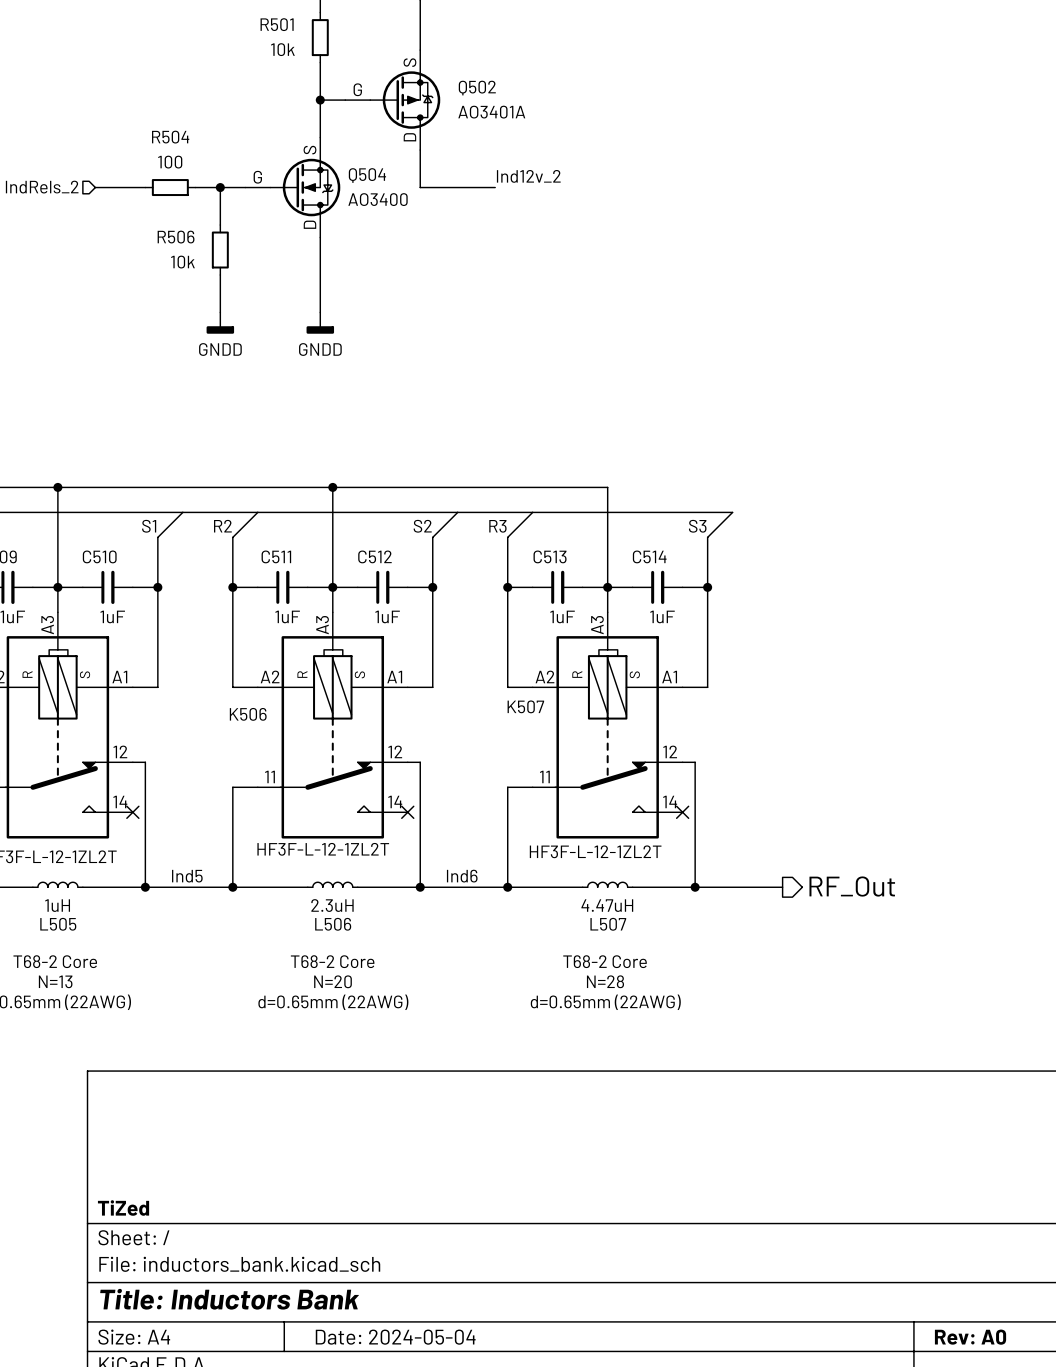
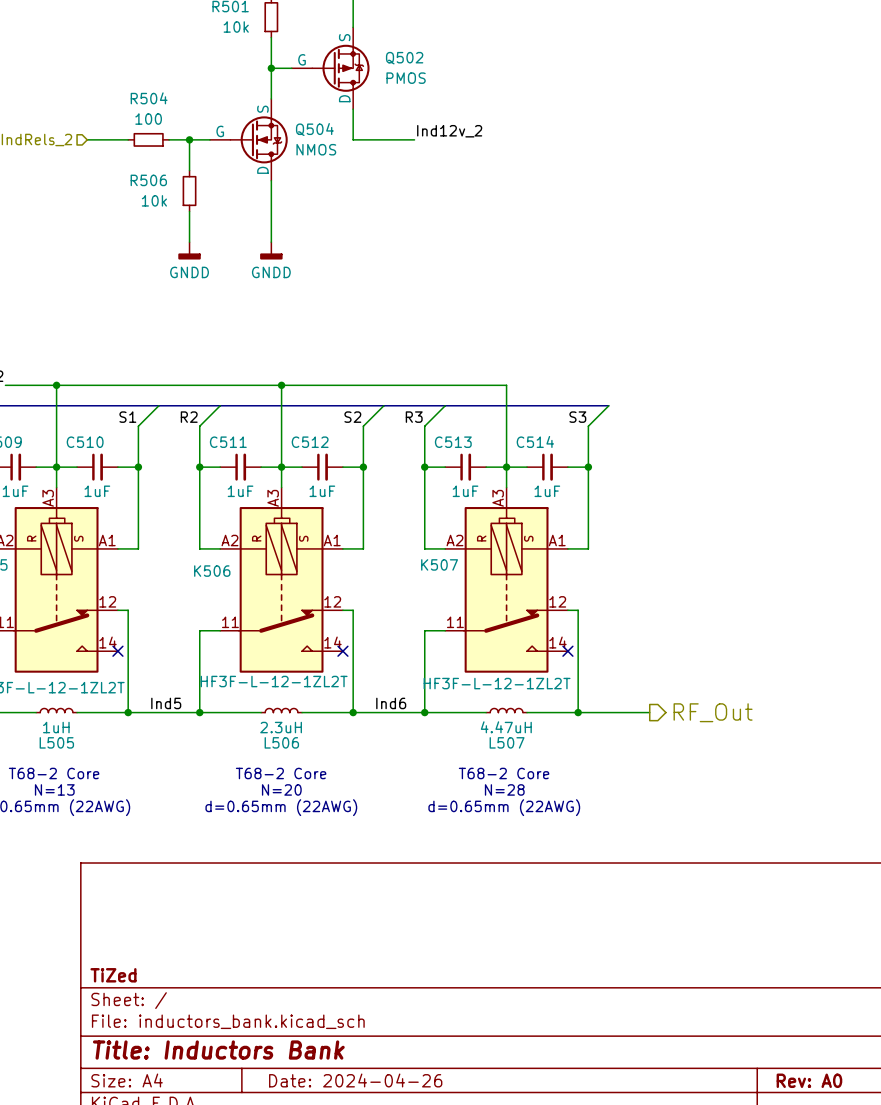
Q502 value: AO3401A (491, 112) -> PMOS (406, 78)
Q504 value: AO3400 (378, 199) -> NMOS (316, 149)
title block: Date: 2024-05-04 (395, 1337) -> Date: 2024-04-26 (355, 1080)

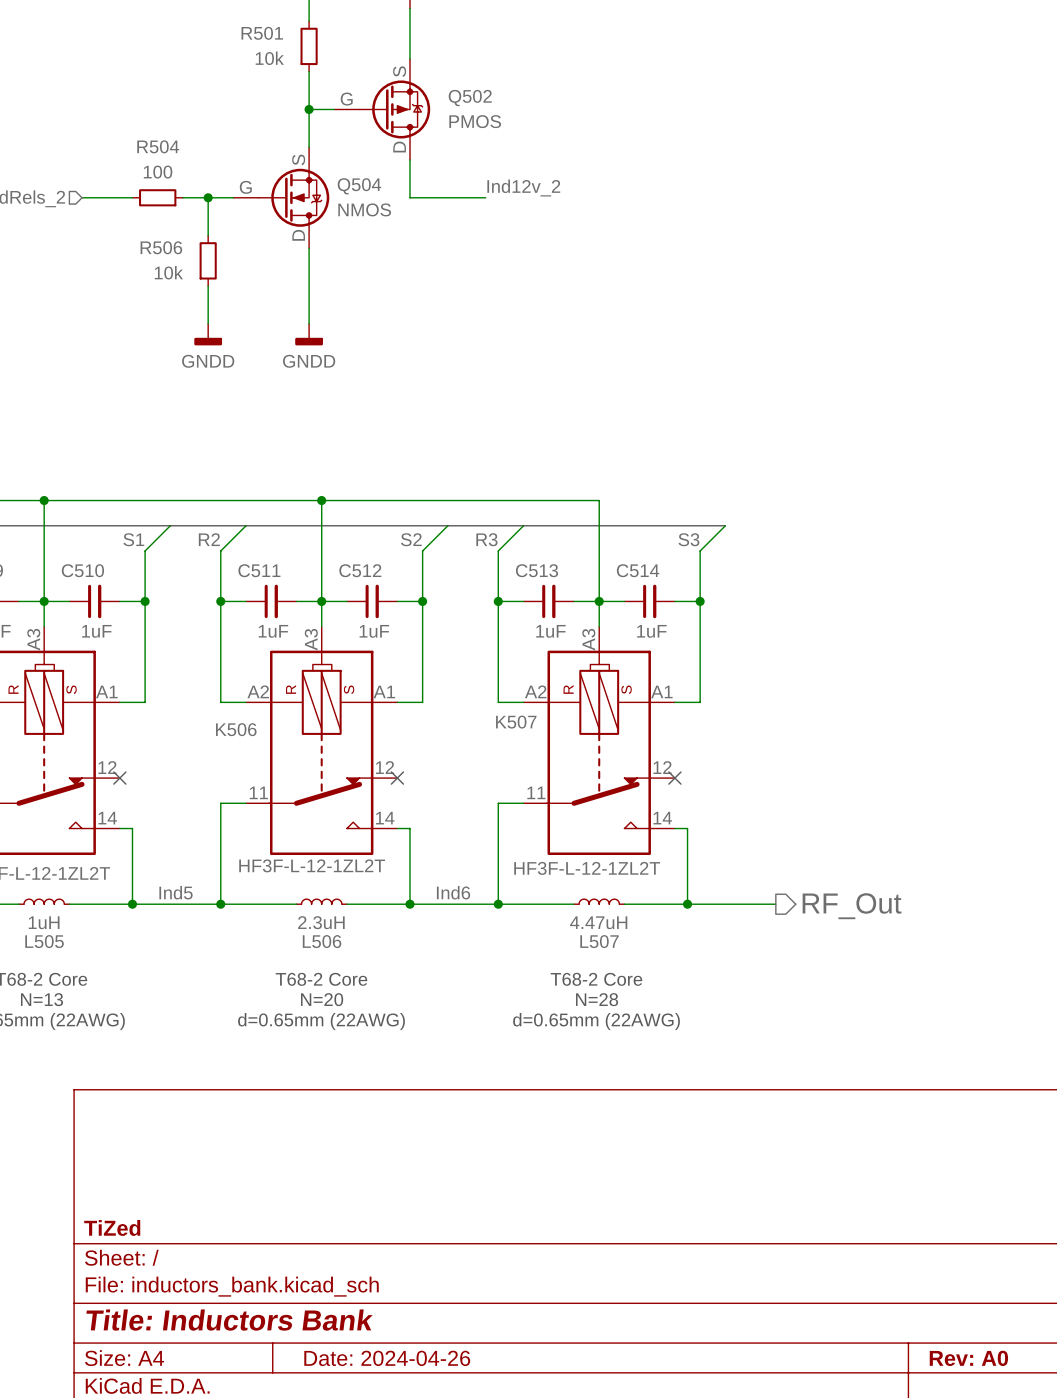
wire: (117, 610) (128, 610) (128, 651) -> (119, 828) (132, 828)
wire: (342, 610) (353, 610) (353, 651) -> (397, 828) (410, 828)
wire: (567, 610) (578, 610) (578, 651) -> (674, 828) (687, 828)
no-connect mark position: (117, 651) -> (119, 778)
no-connect mark position: (342, 651) -> (397, 778)
no-connect mark position: (567, 651) -> (674, 778)

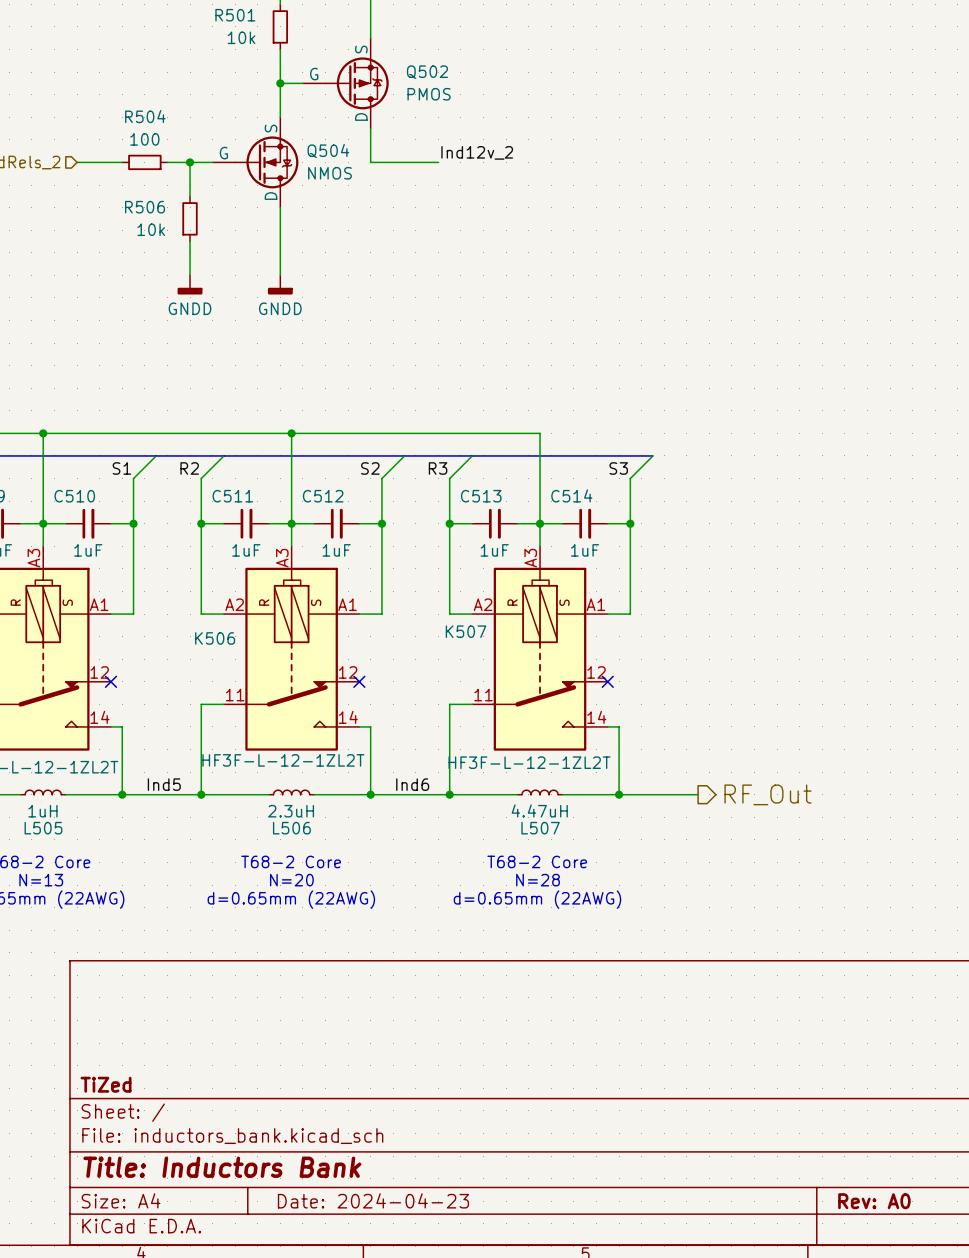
title block: Date: 2024-04-26 (387, 1358) -> Date: 2024-04-23 (373, 1200)

